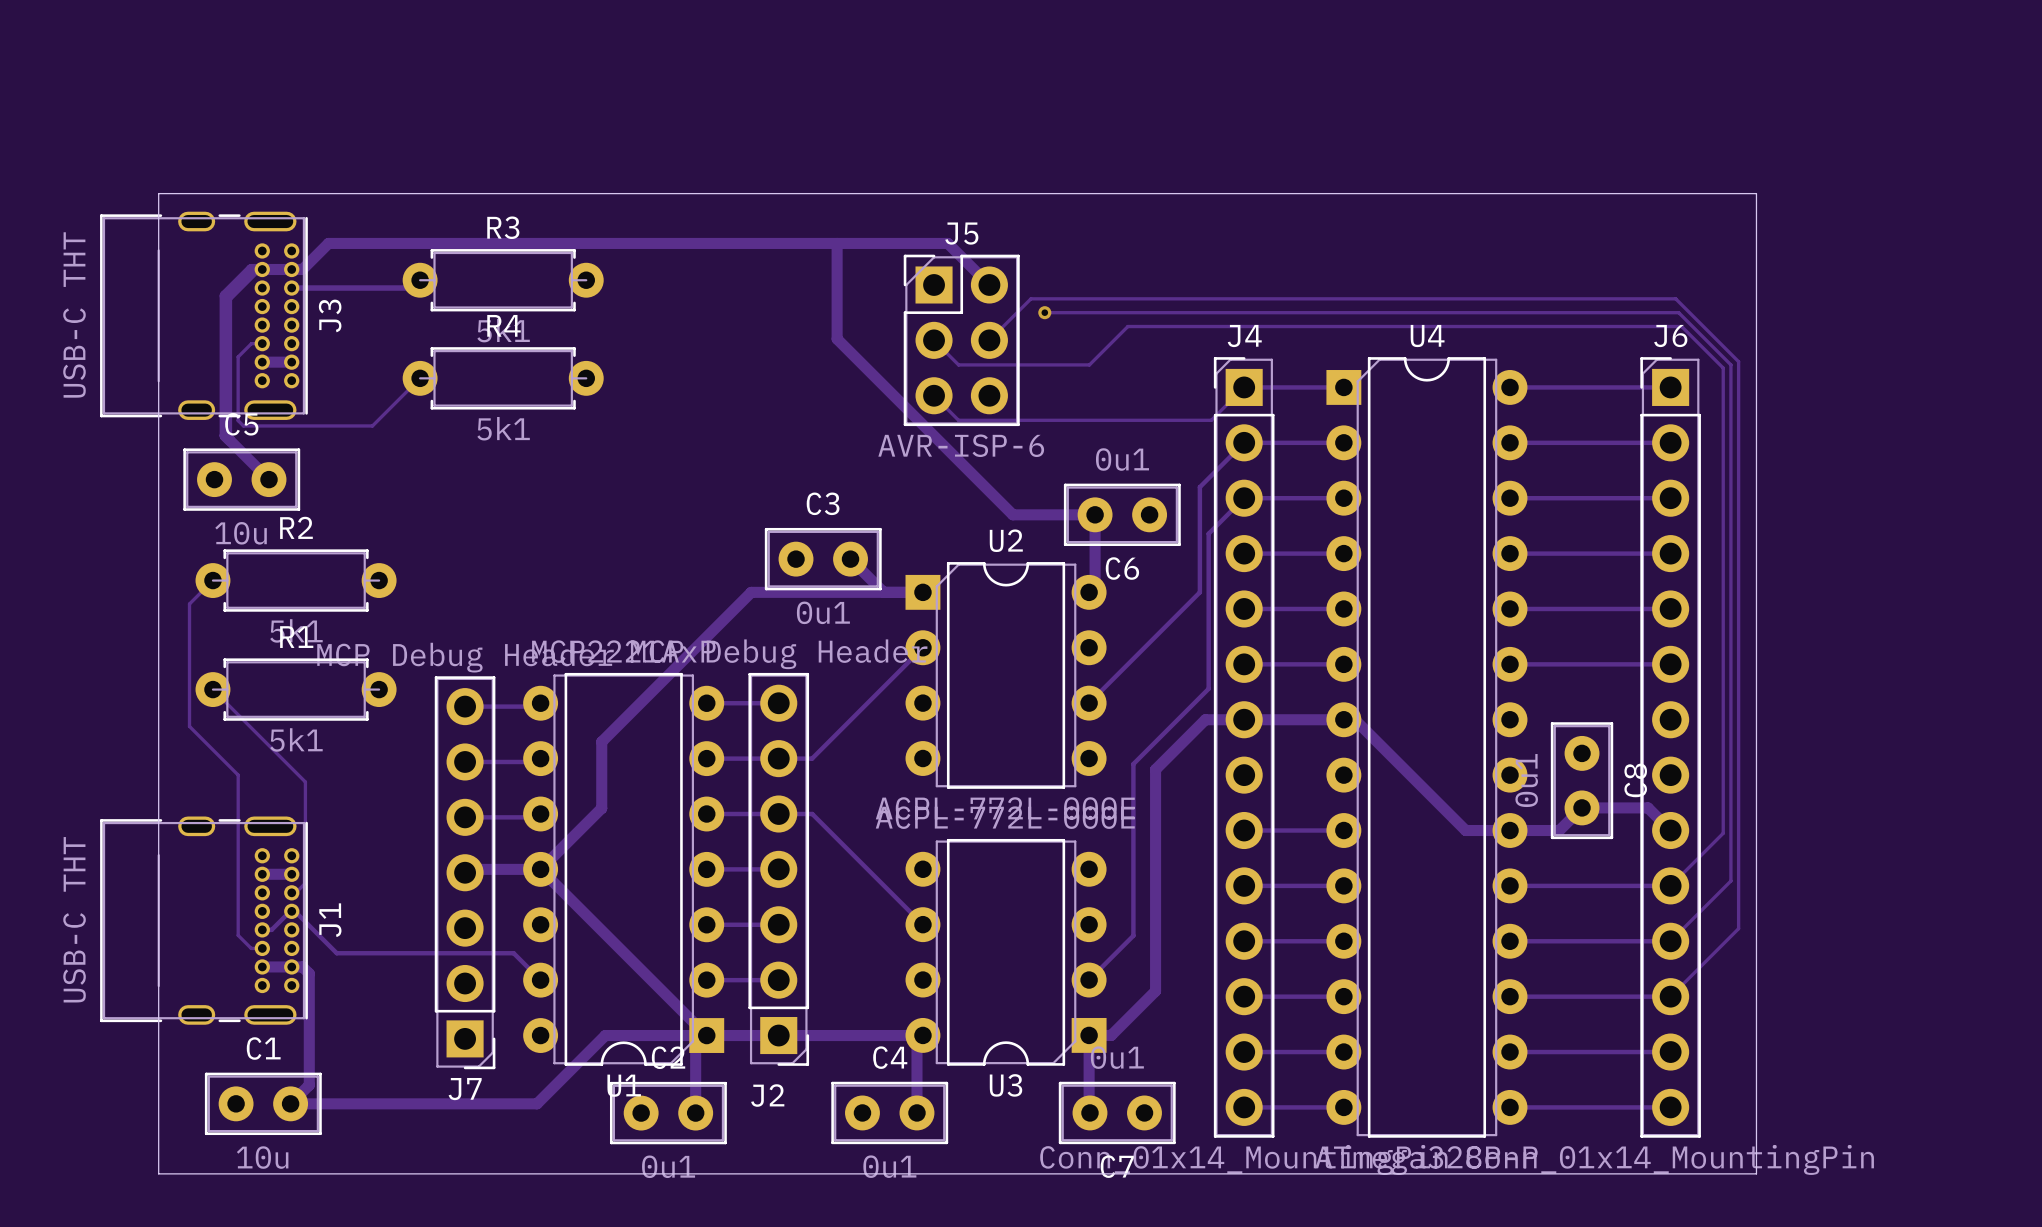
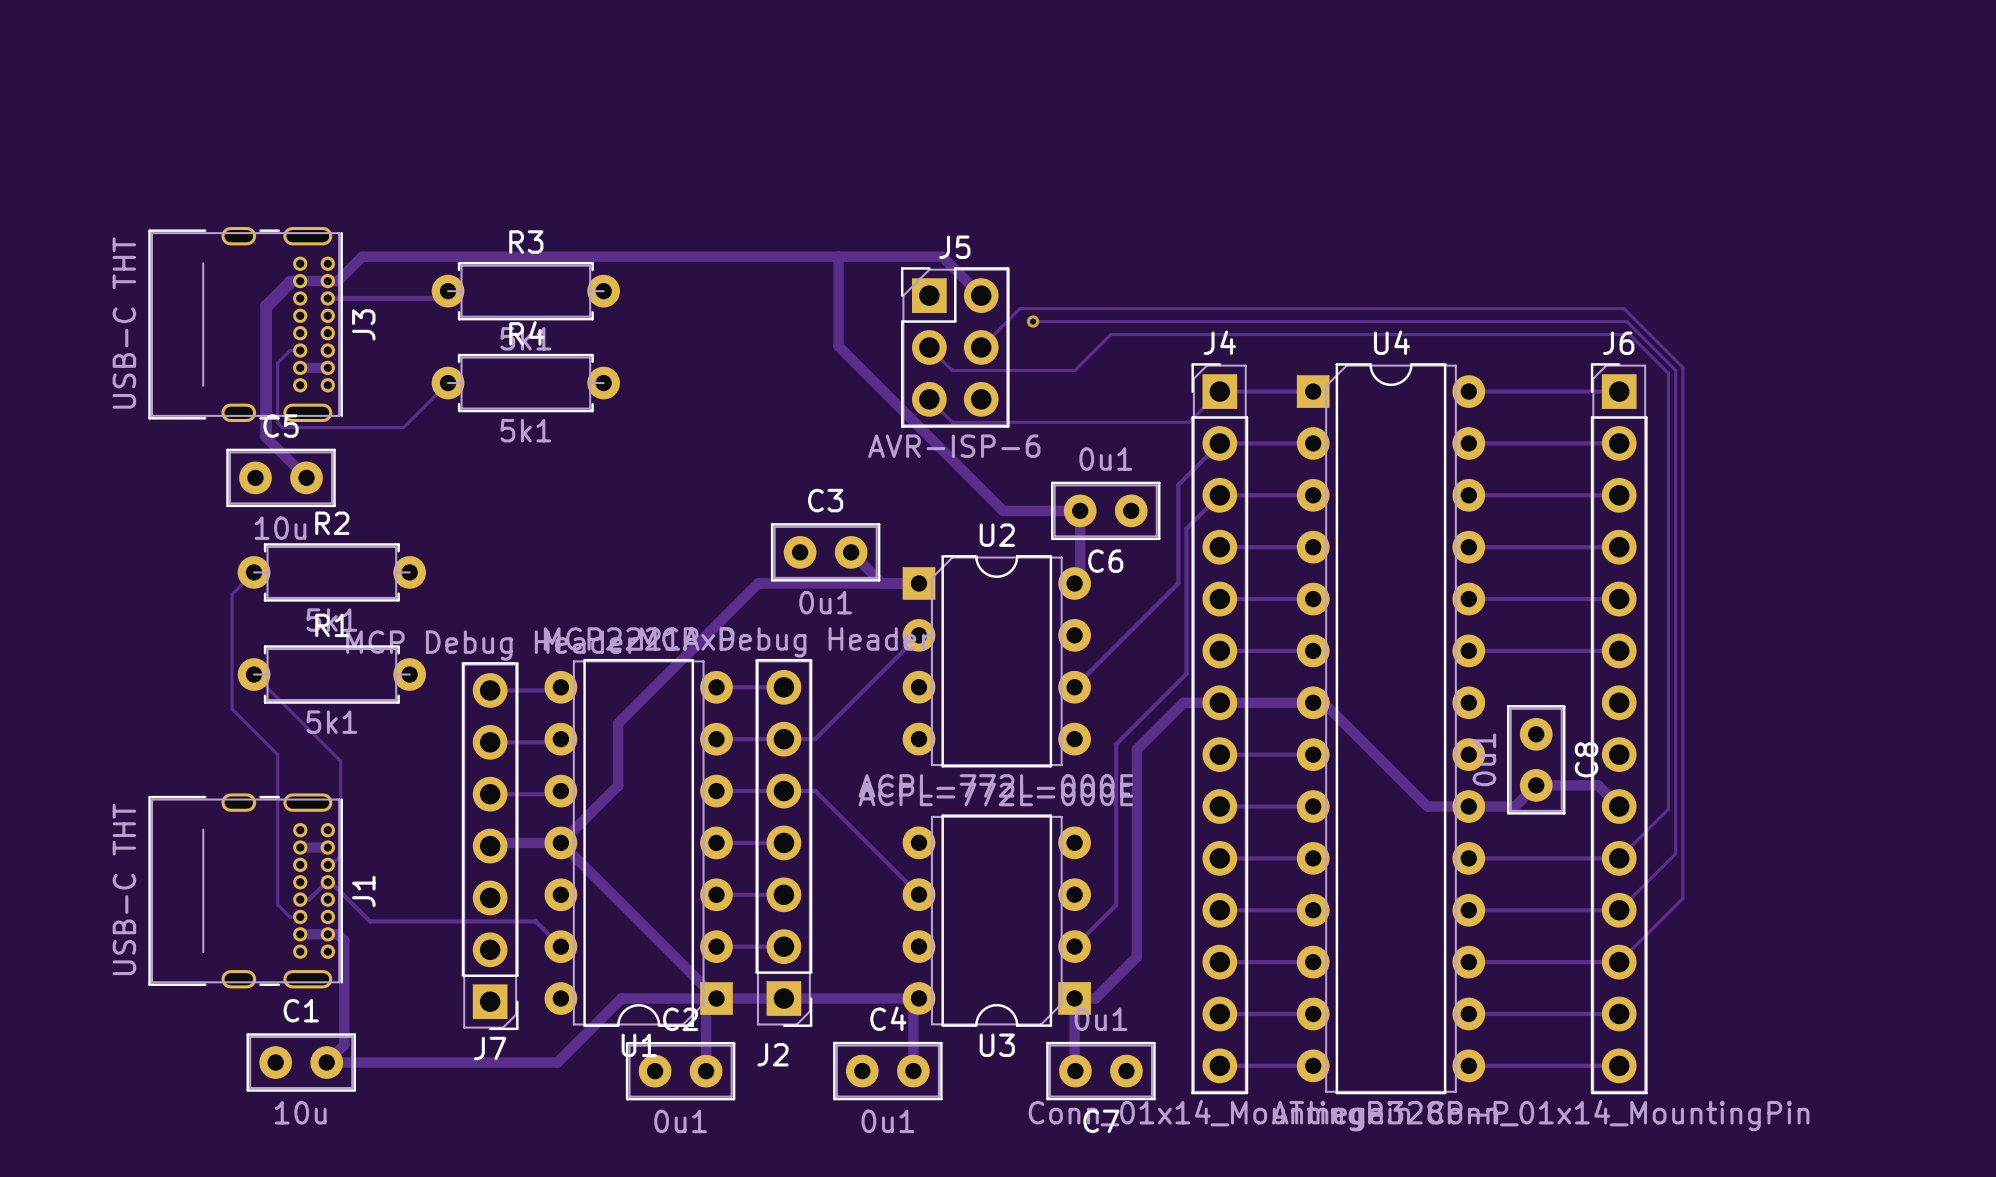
board edge: (158, 193) (1756, 193) (1756, 1173) (158, 1173) (158, 193) -> none
track: none -> (1219, 754) (1313, 754)

